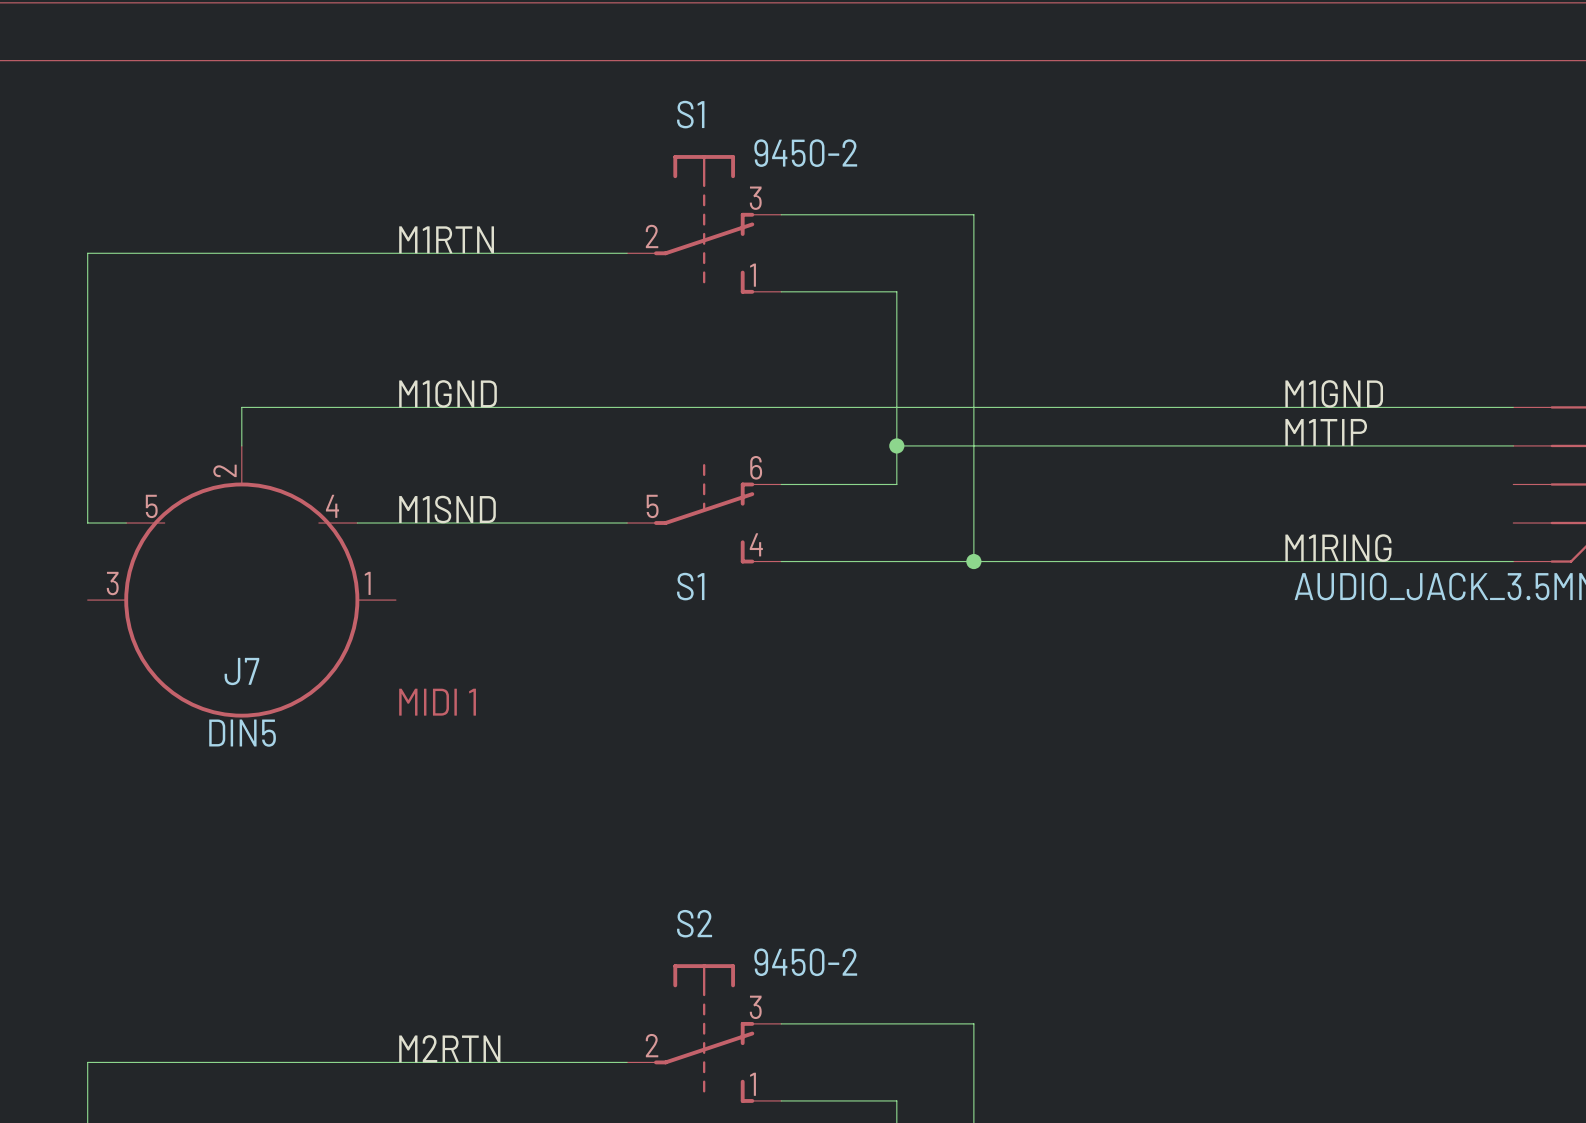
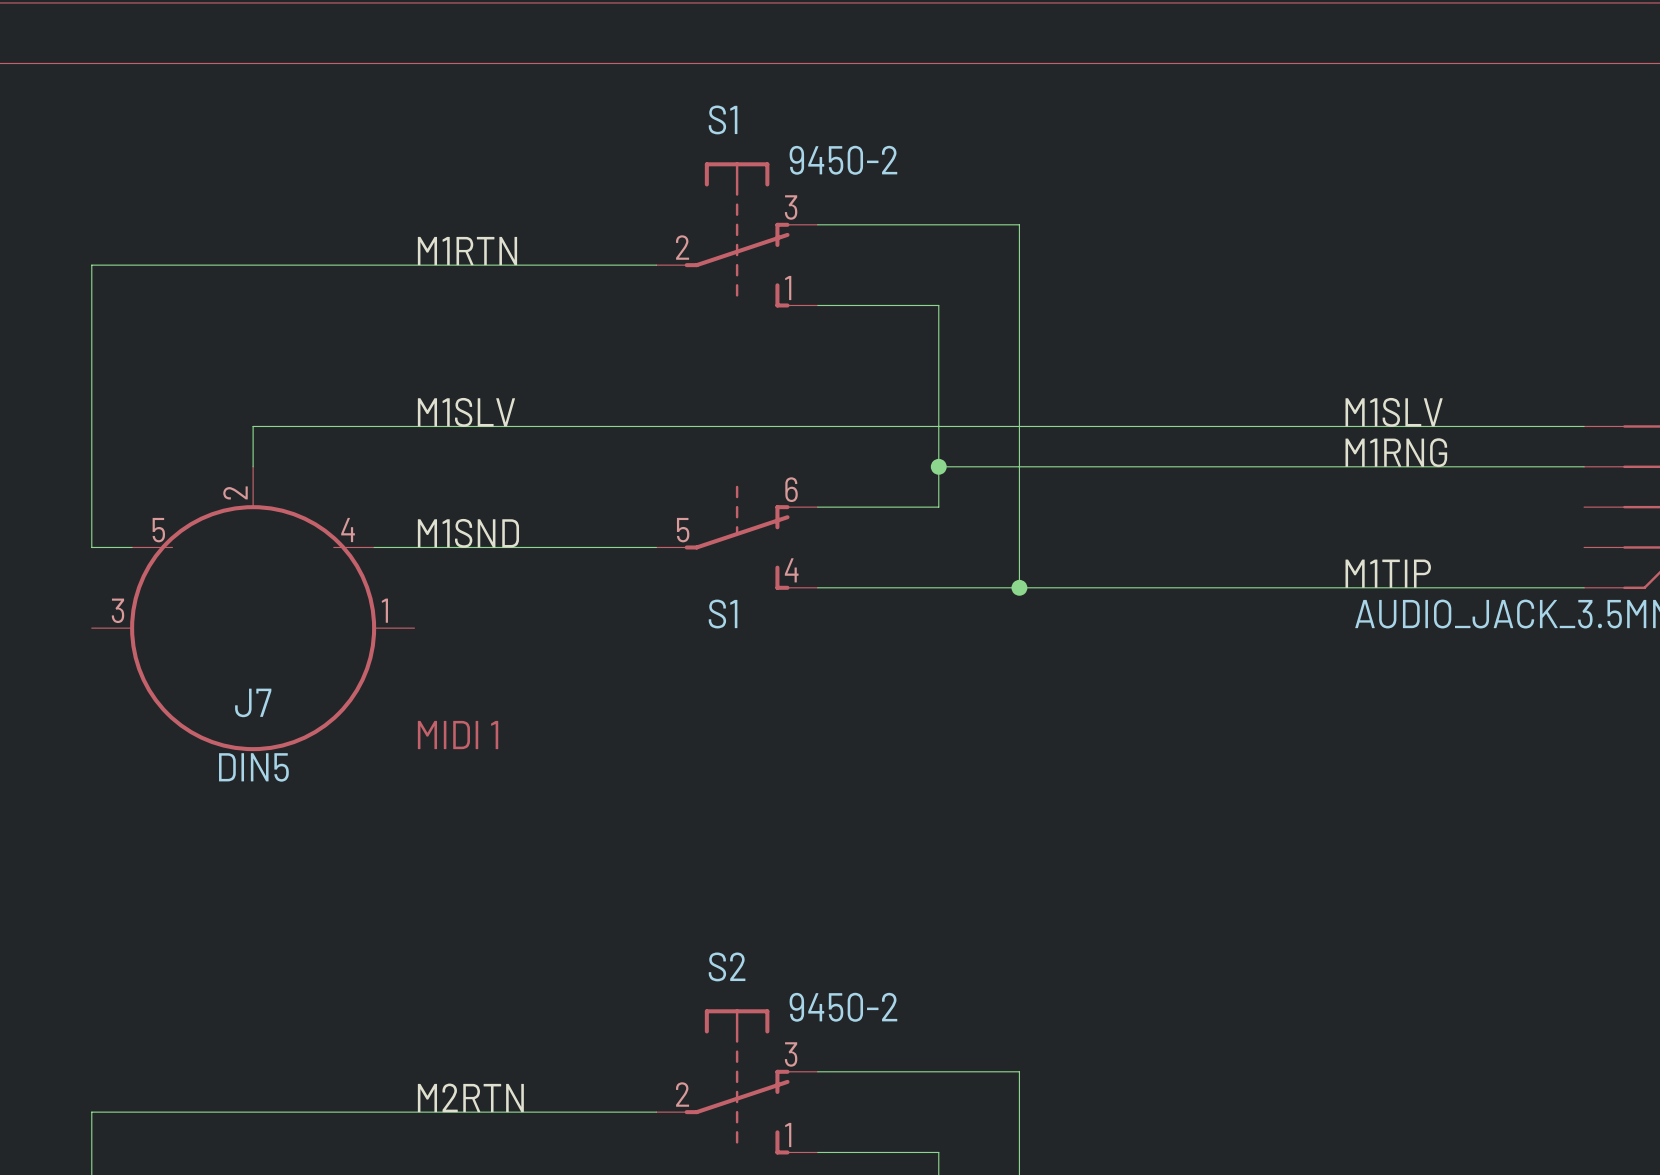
label: M1GND (448, 393) -> M1SLV (466, 412)
label: M1GND (1334, 393) -> M1SLV (1394, 412)
label: M1TIP (1326, 432) -> M1RNG (1396, 452)
label: M1RING (1338, 548) -> M1TIP (1388, 573)

